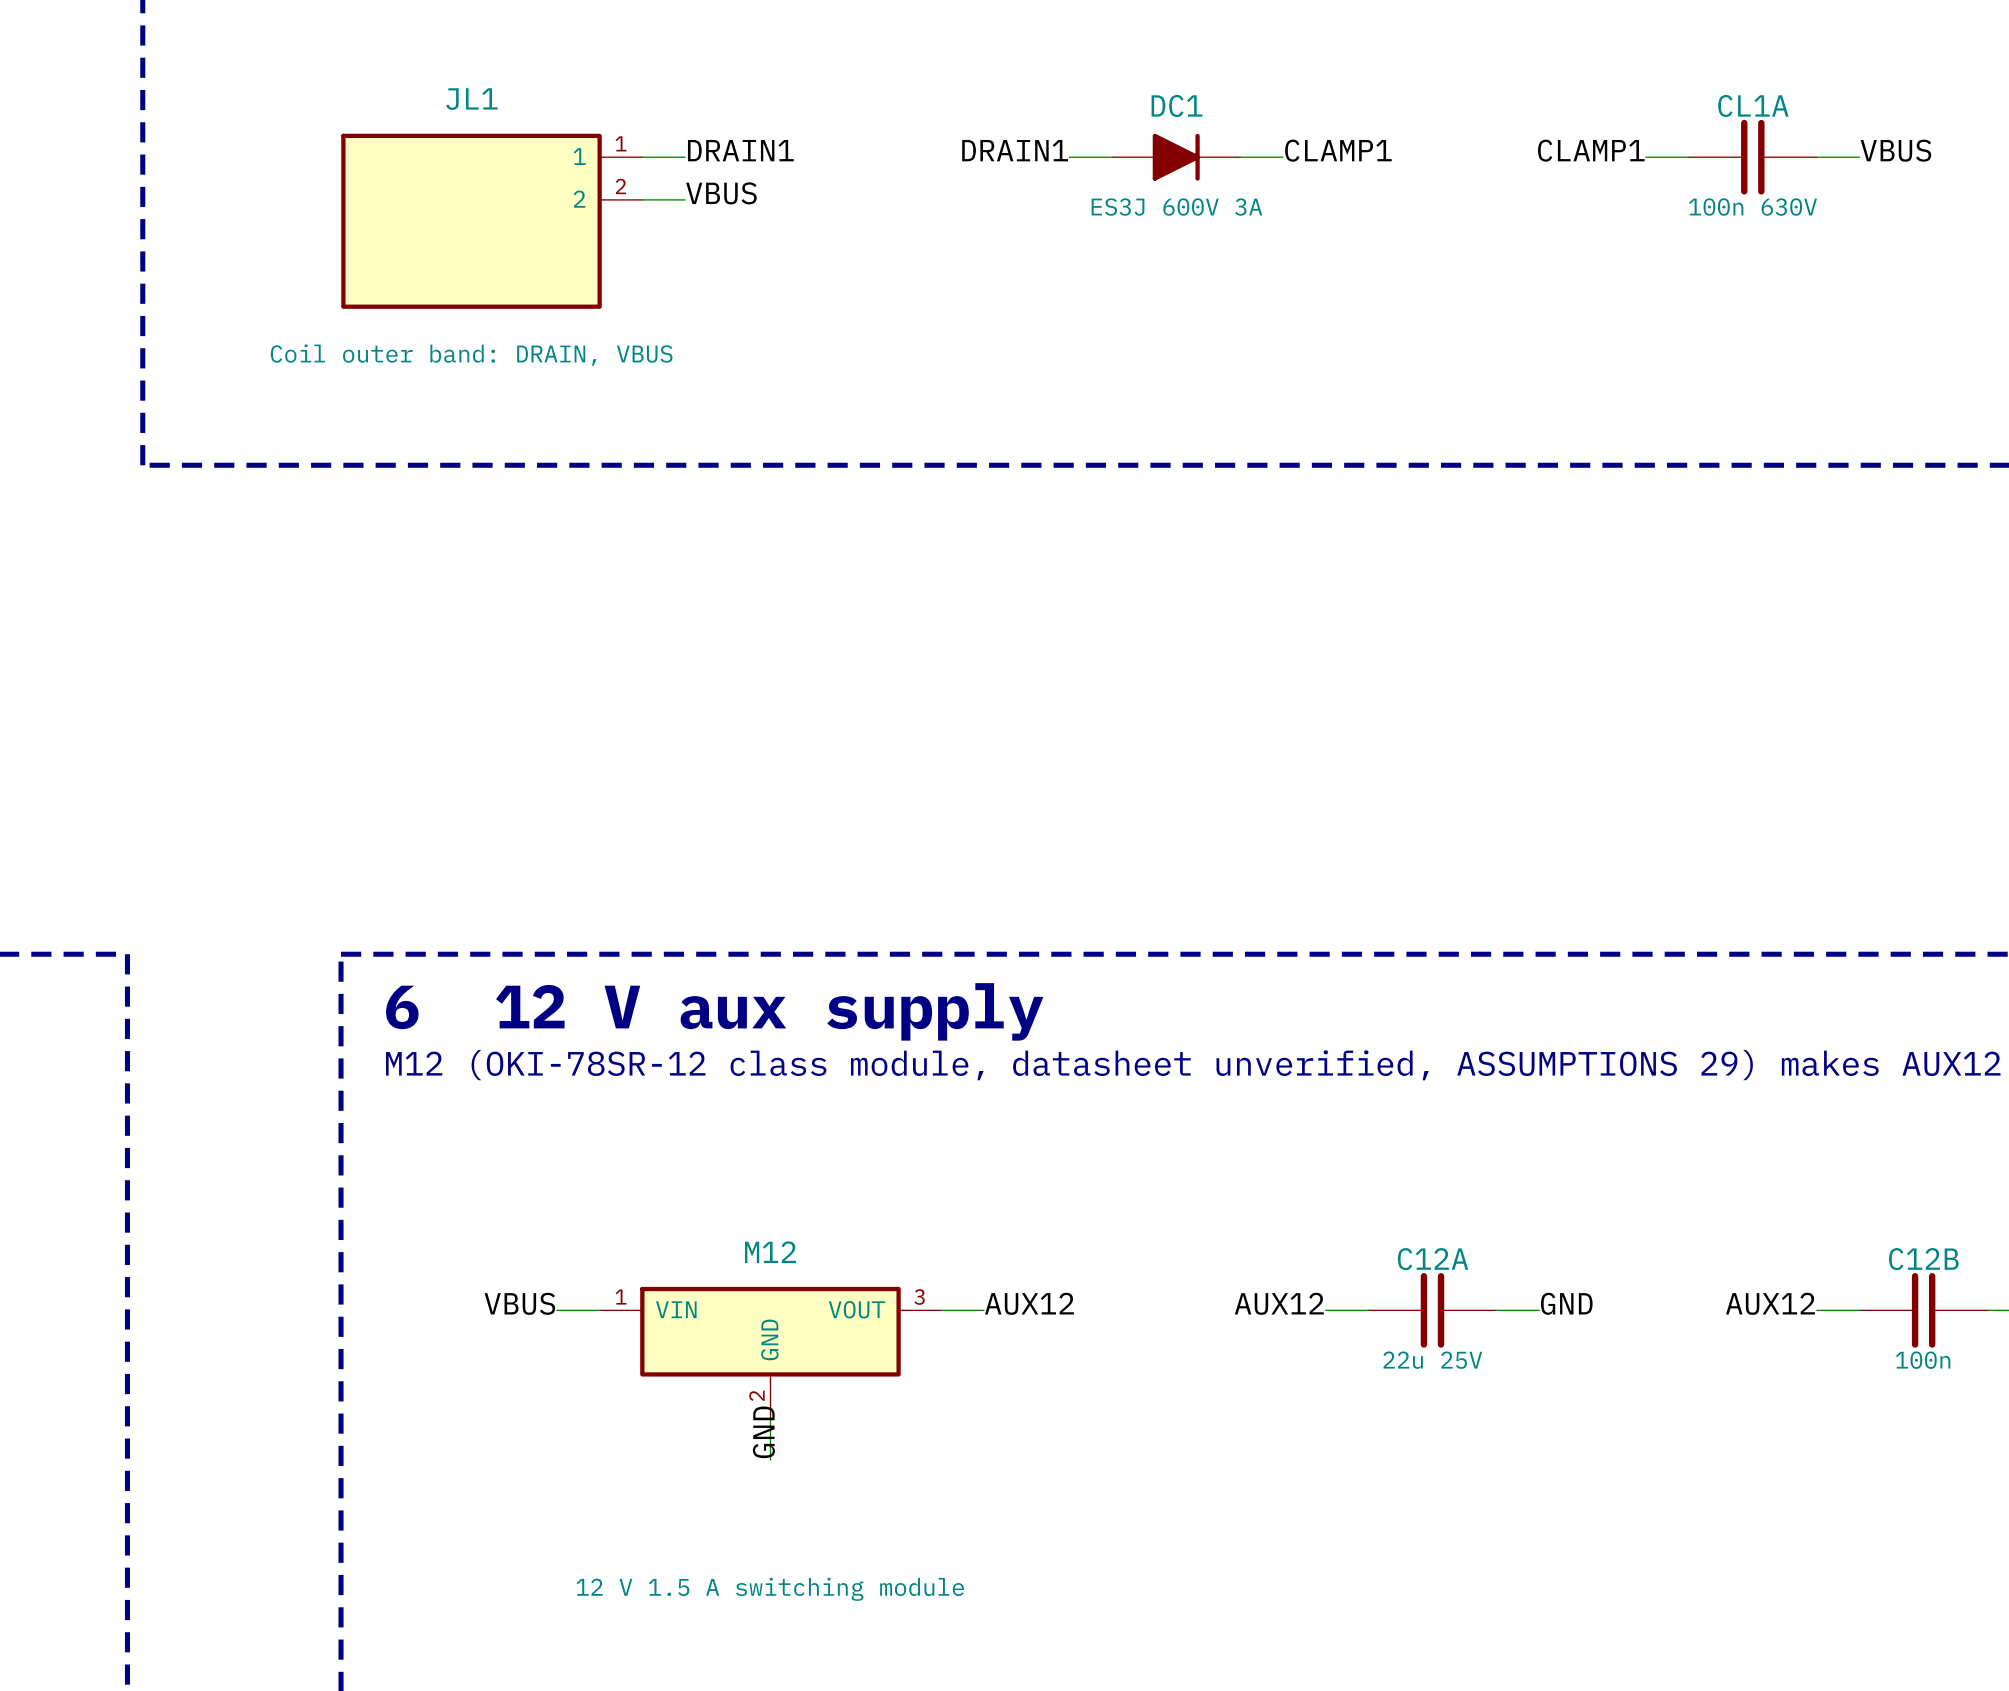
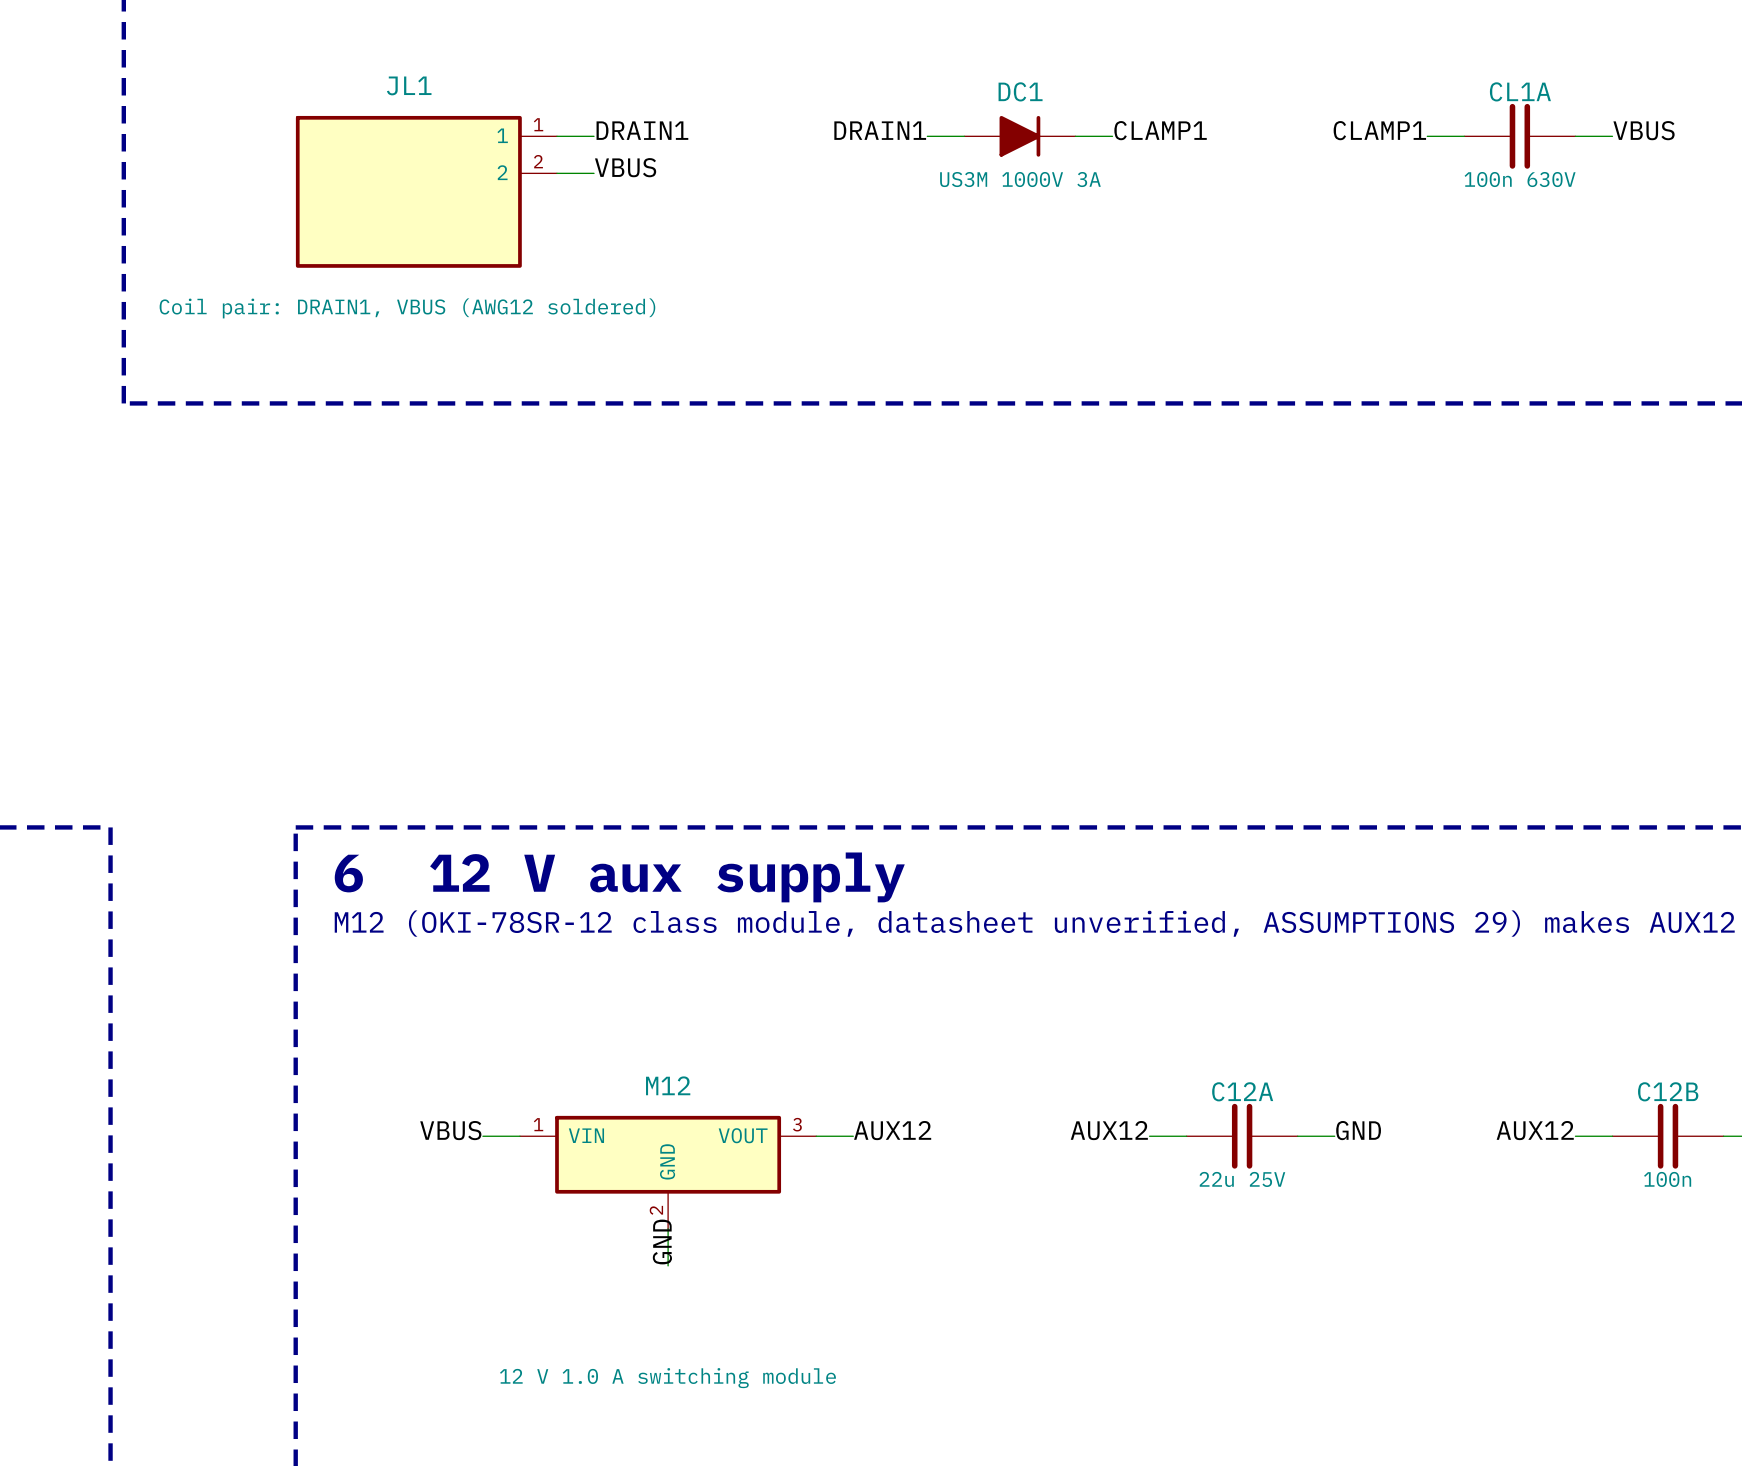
DC1 value: ES3J 600V 3A (1176, 207) -> US3M 1000V 3A (1020, 179)
JL1 value: Coil outer band: DRAIN, VBUS (471, 355) -> Coil pair: DRAIN1, VBUS (AWG12 soldered) (407, 308)
M12 value: 12 V 1.5 A switching module (770, 1589) -> 12 V 1.0 A switching module (667, 1378)

